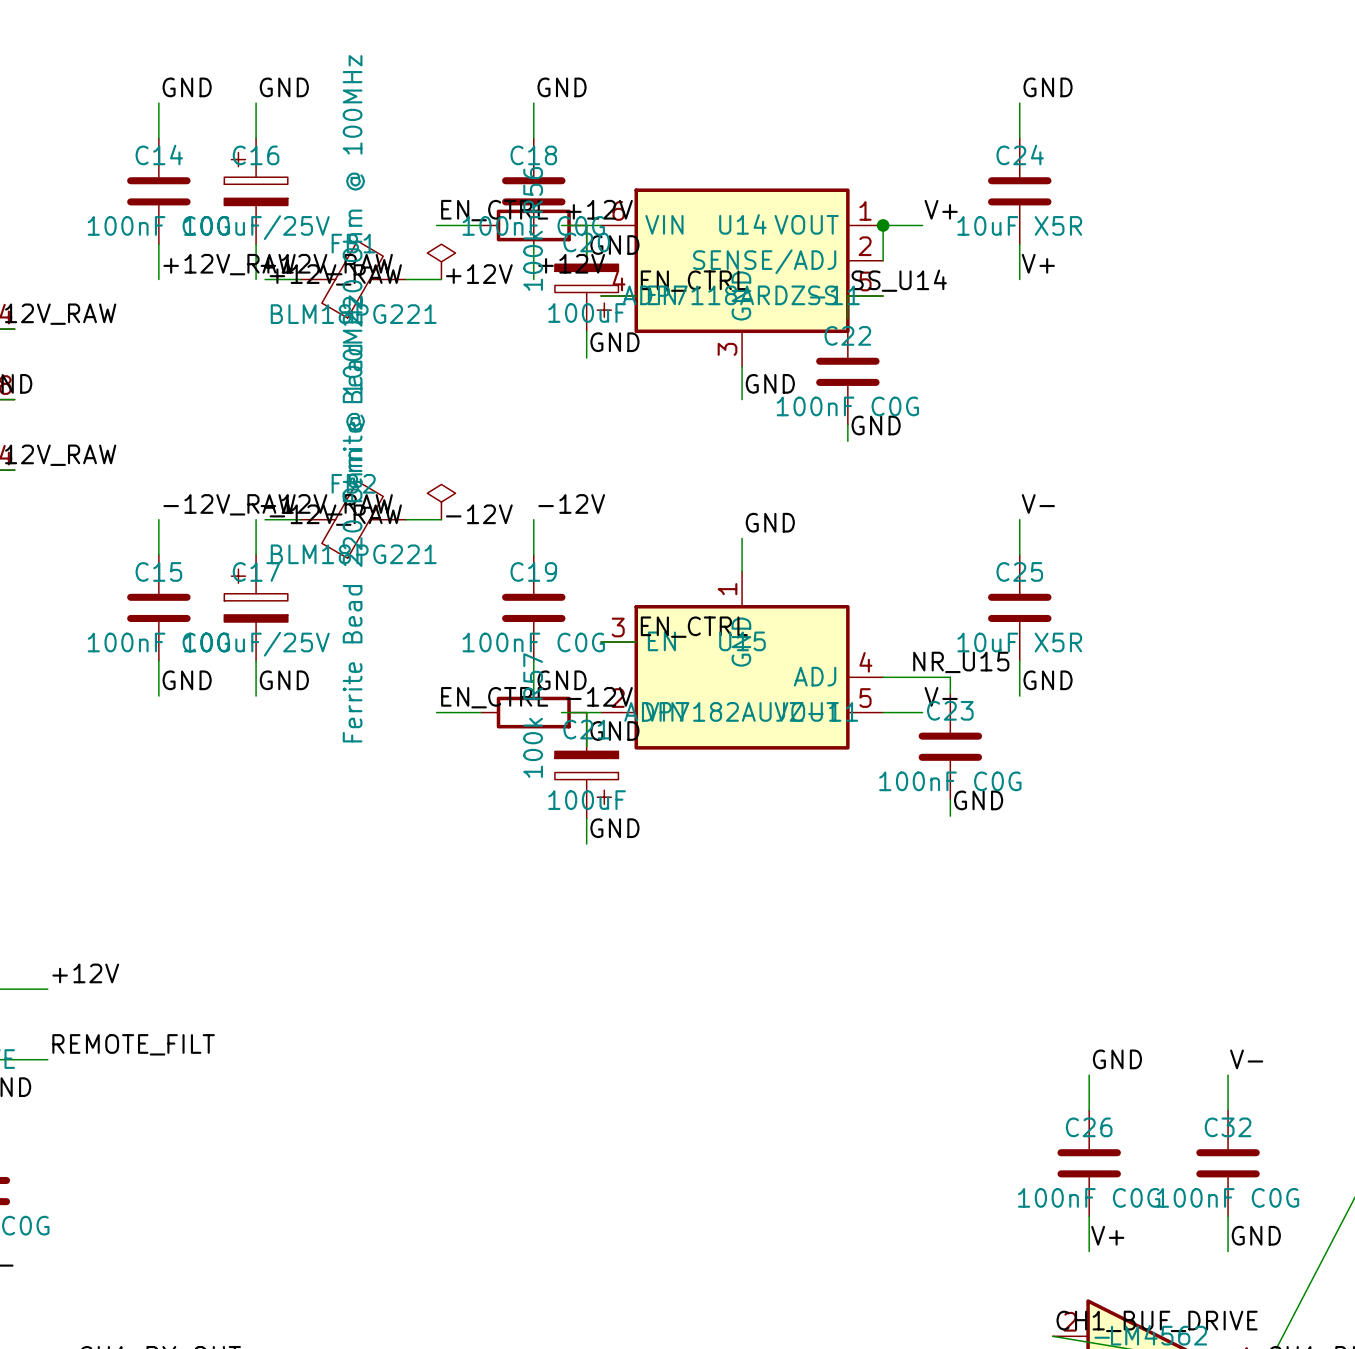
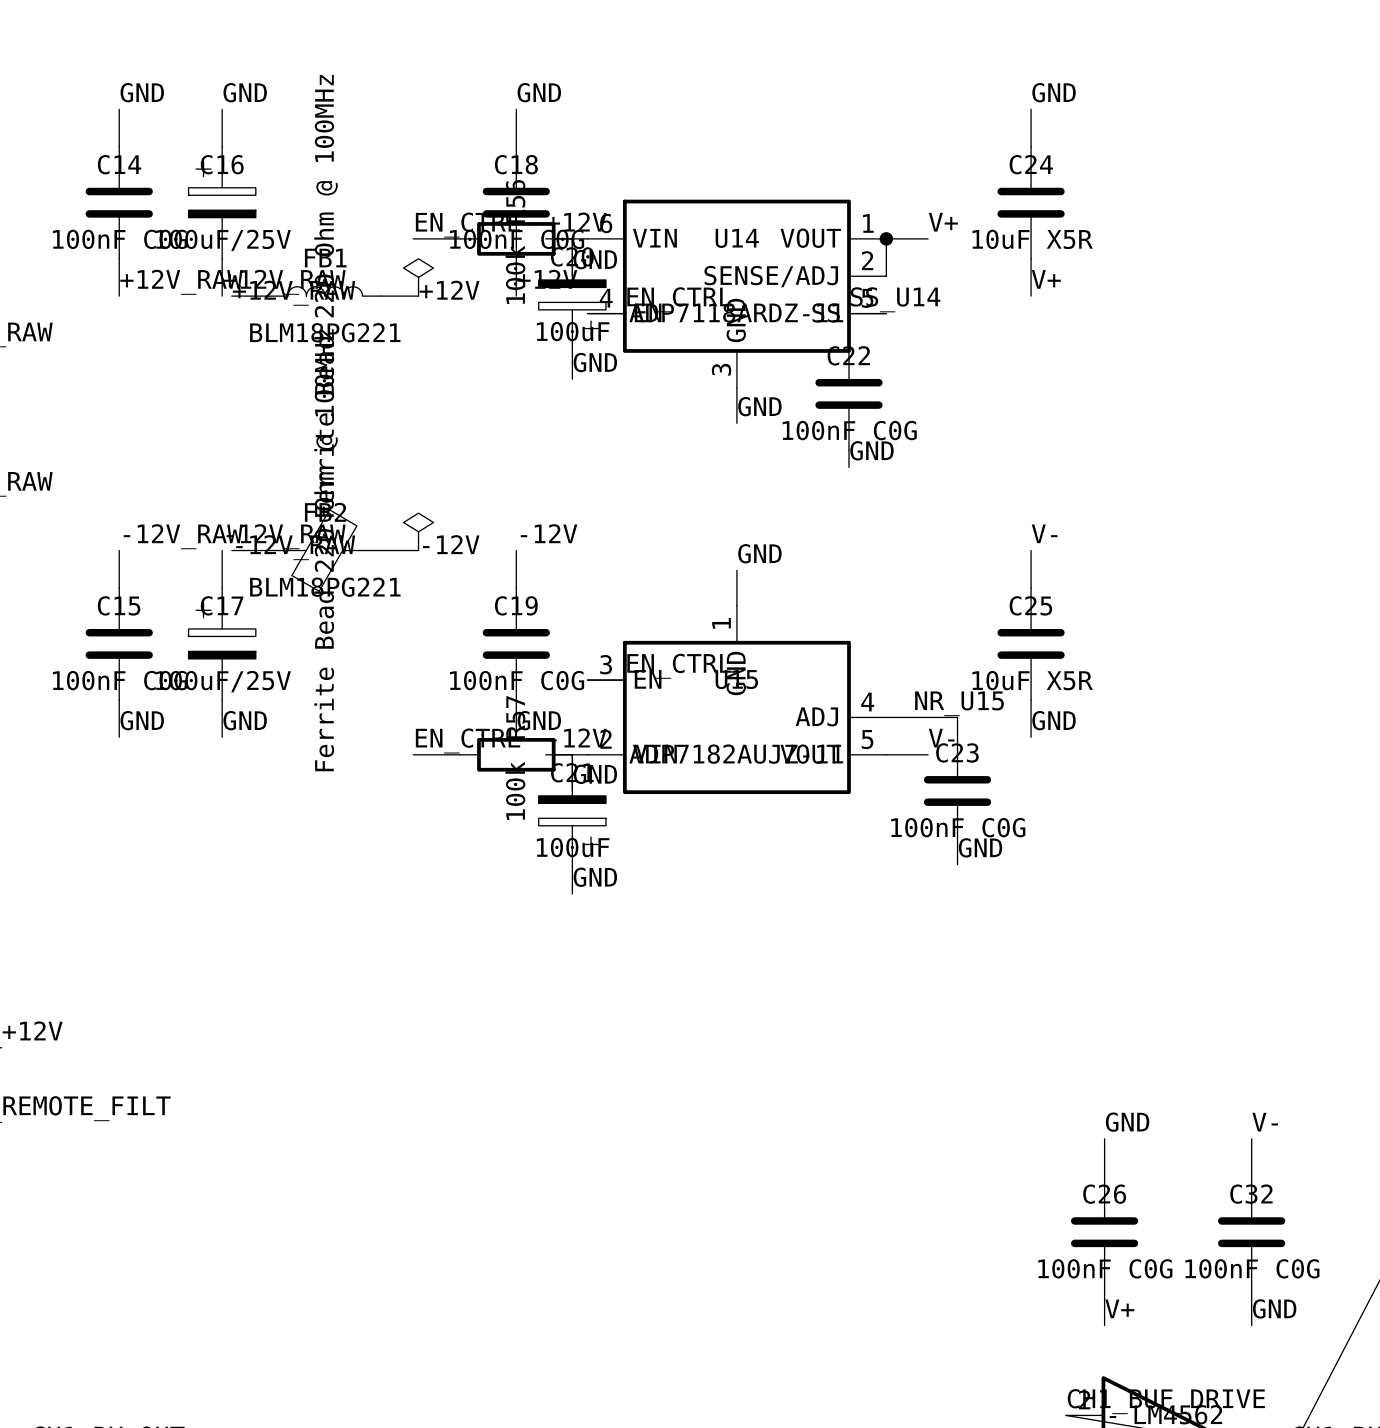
FB1 symbol: [300, 241, 407, 318] -> [269, 286, 382, 297]

